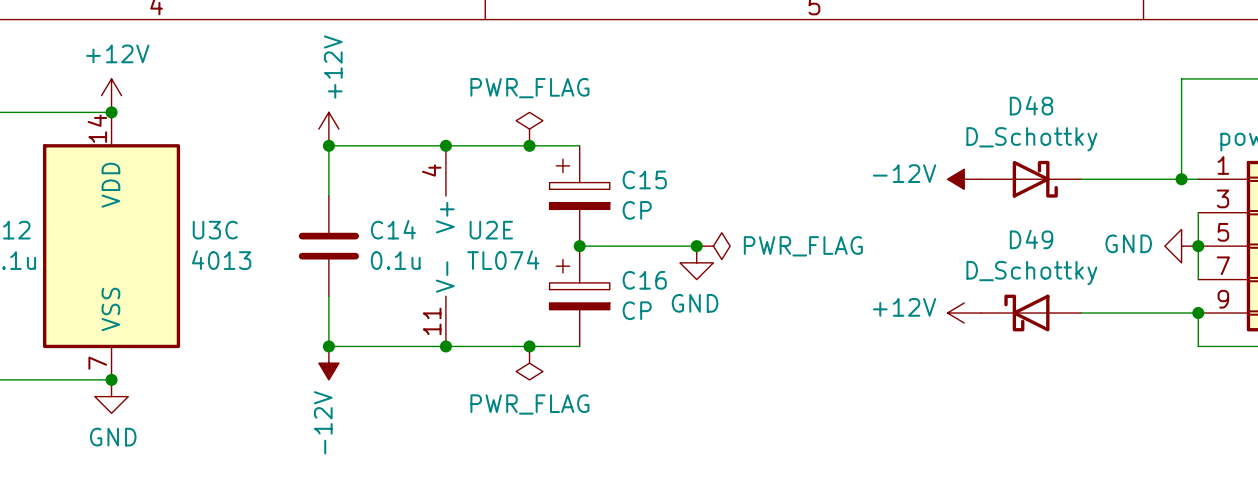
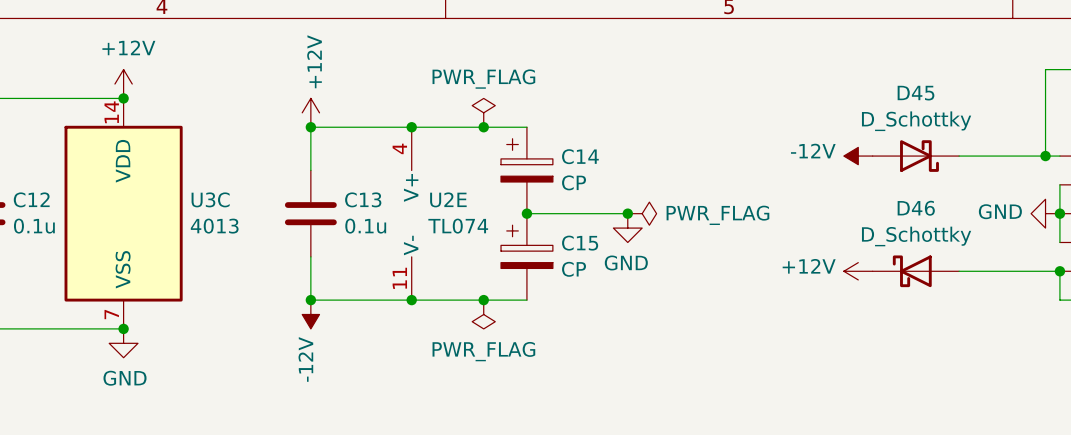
D48 name: D48 (1031, 105) -> D45 (915, 93)
C15 name: C15 (644, 179) -> C14 (580, 156)
C14 name: C14 (393, 229) -> C13 (363, 199)
D49 name: D49 (1031, 239) -> D46 (916, 208)
C16 name: C16 (644, 280) -> C15 (580, 243)

